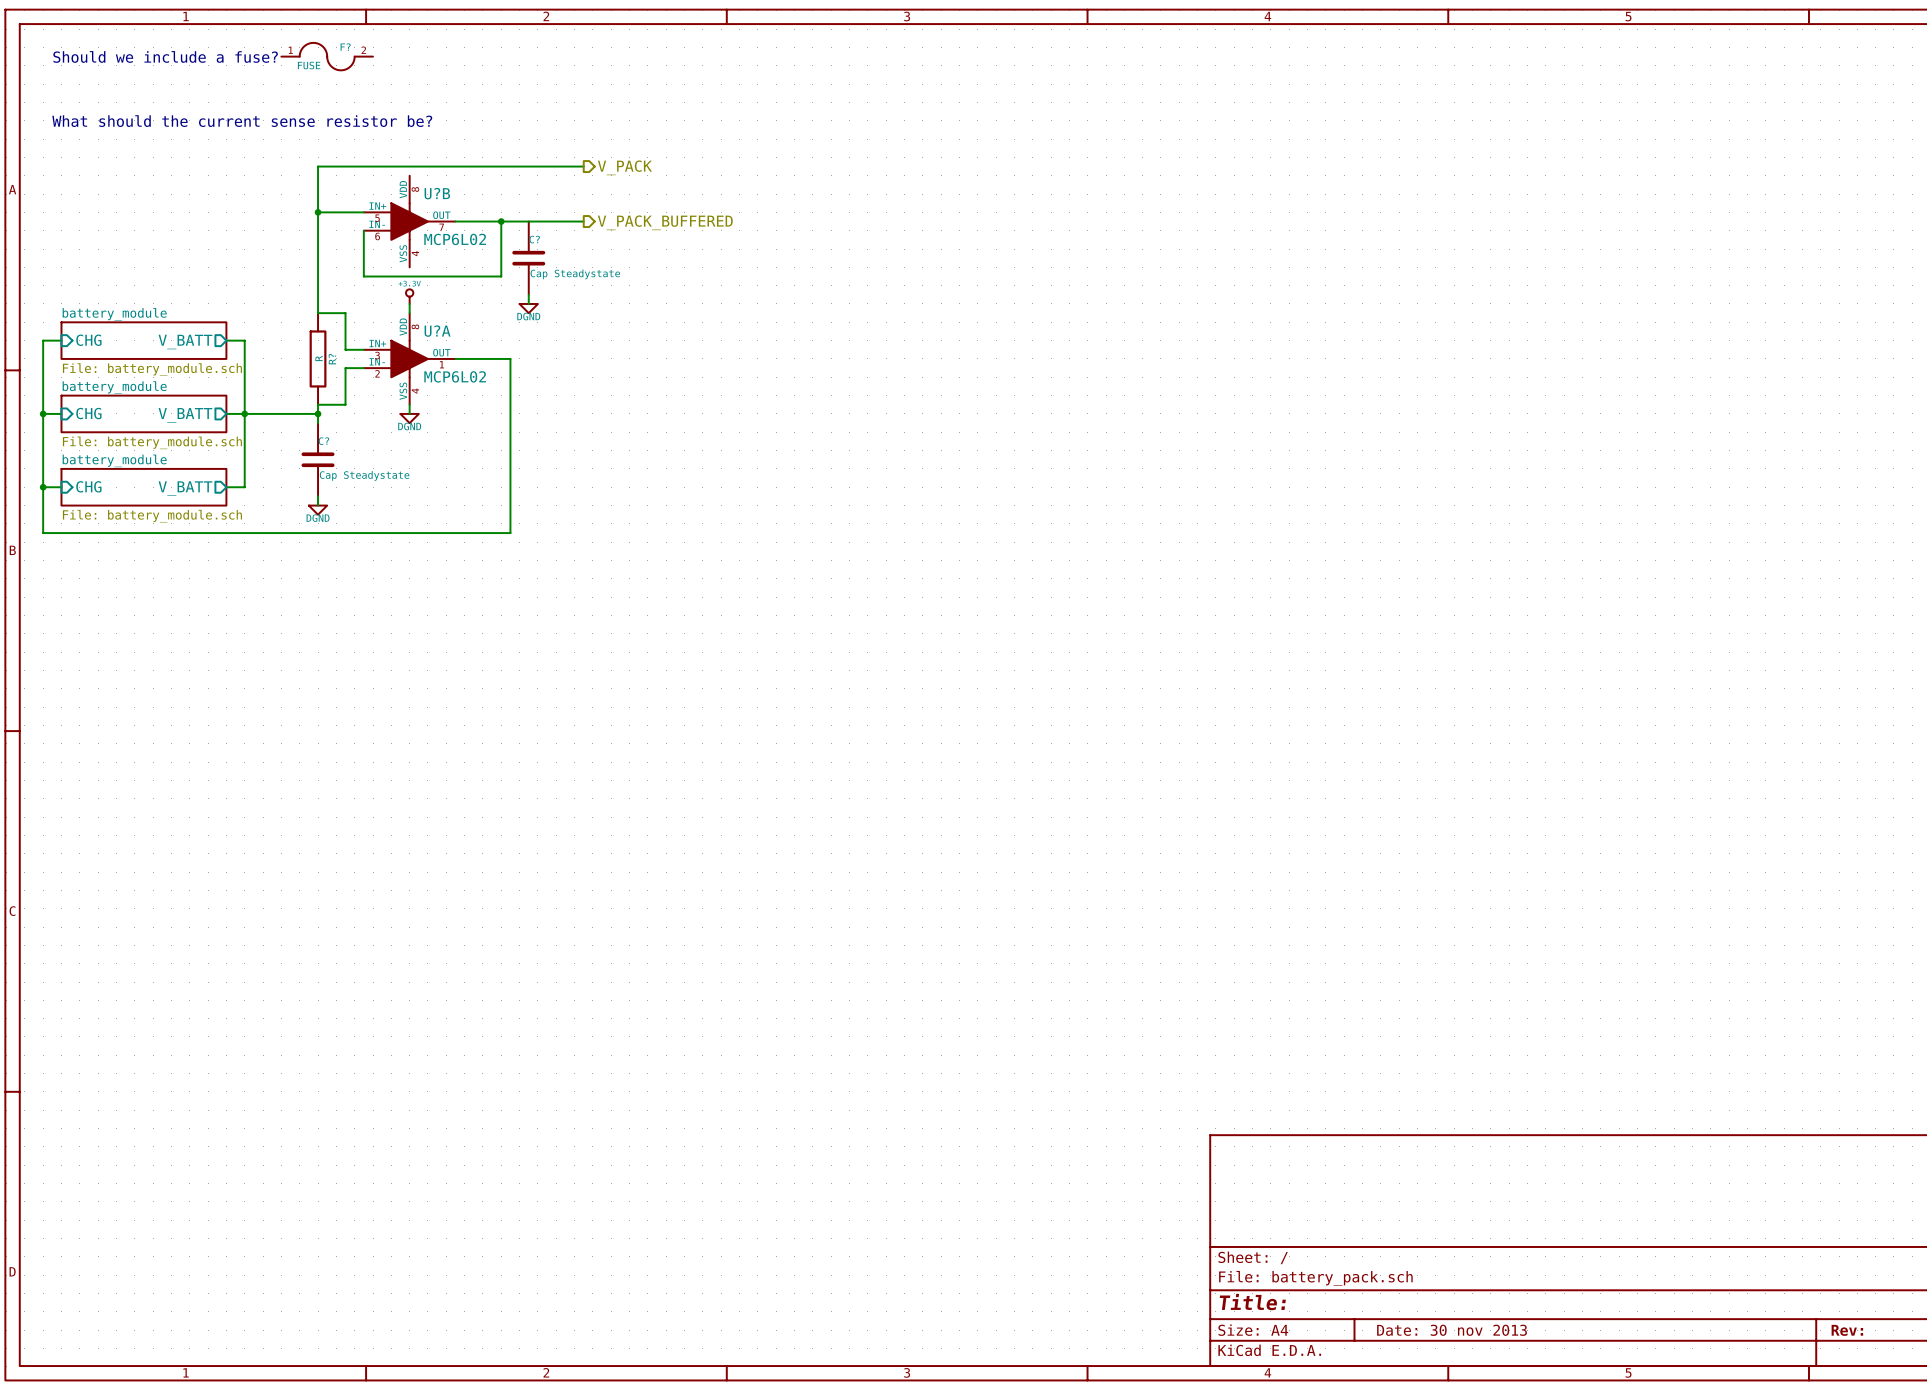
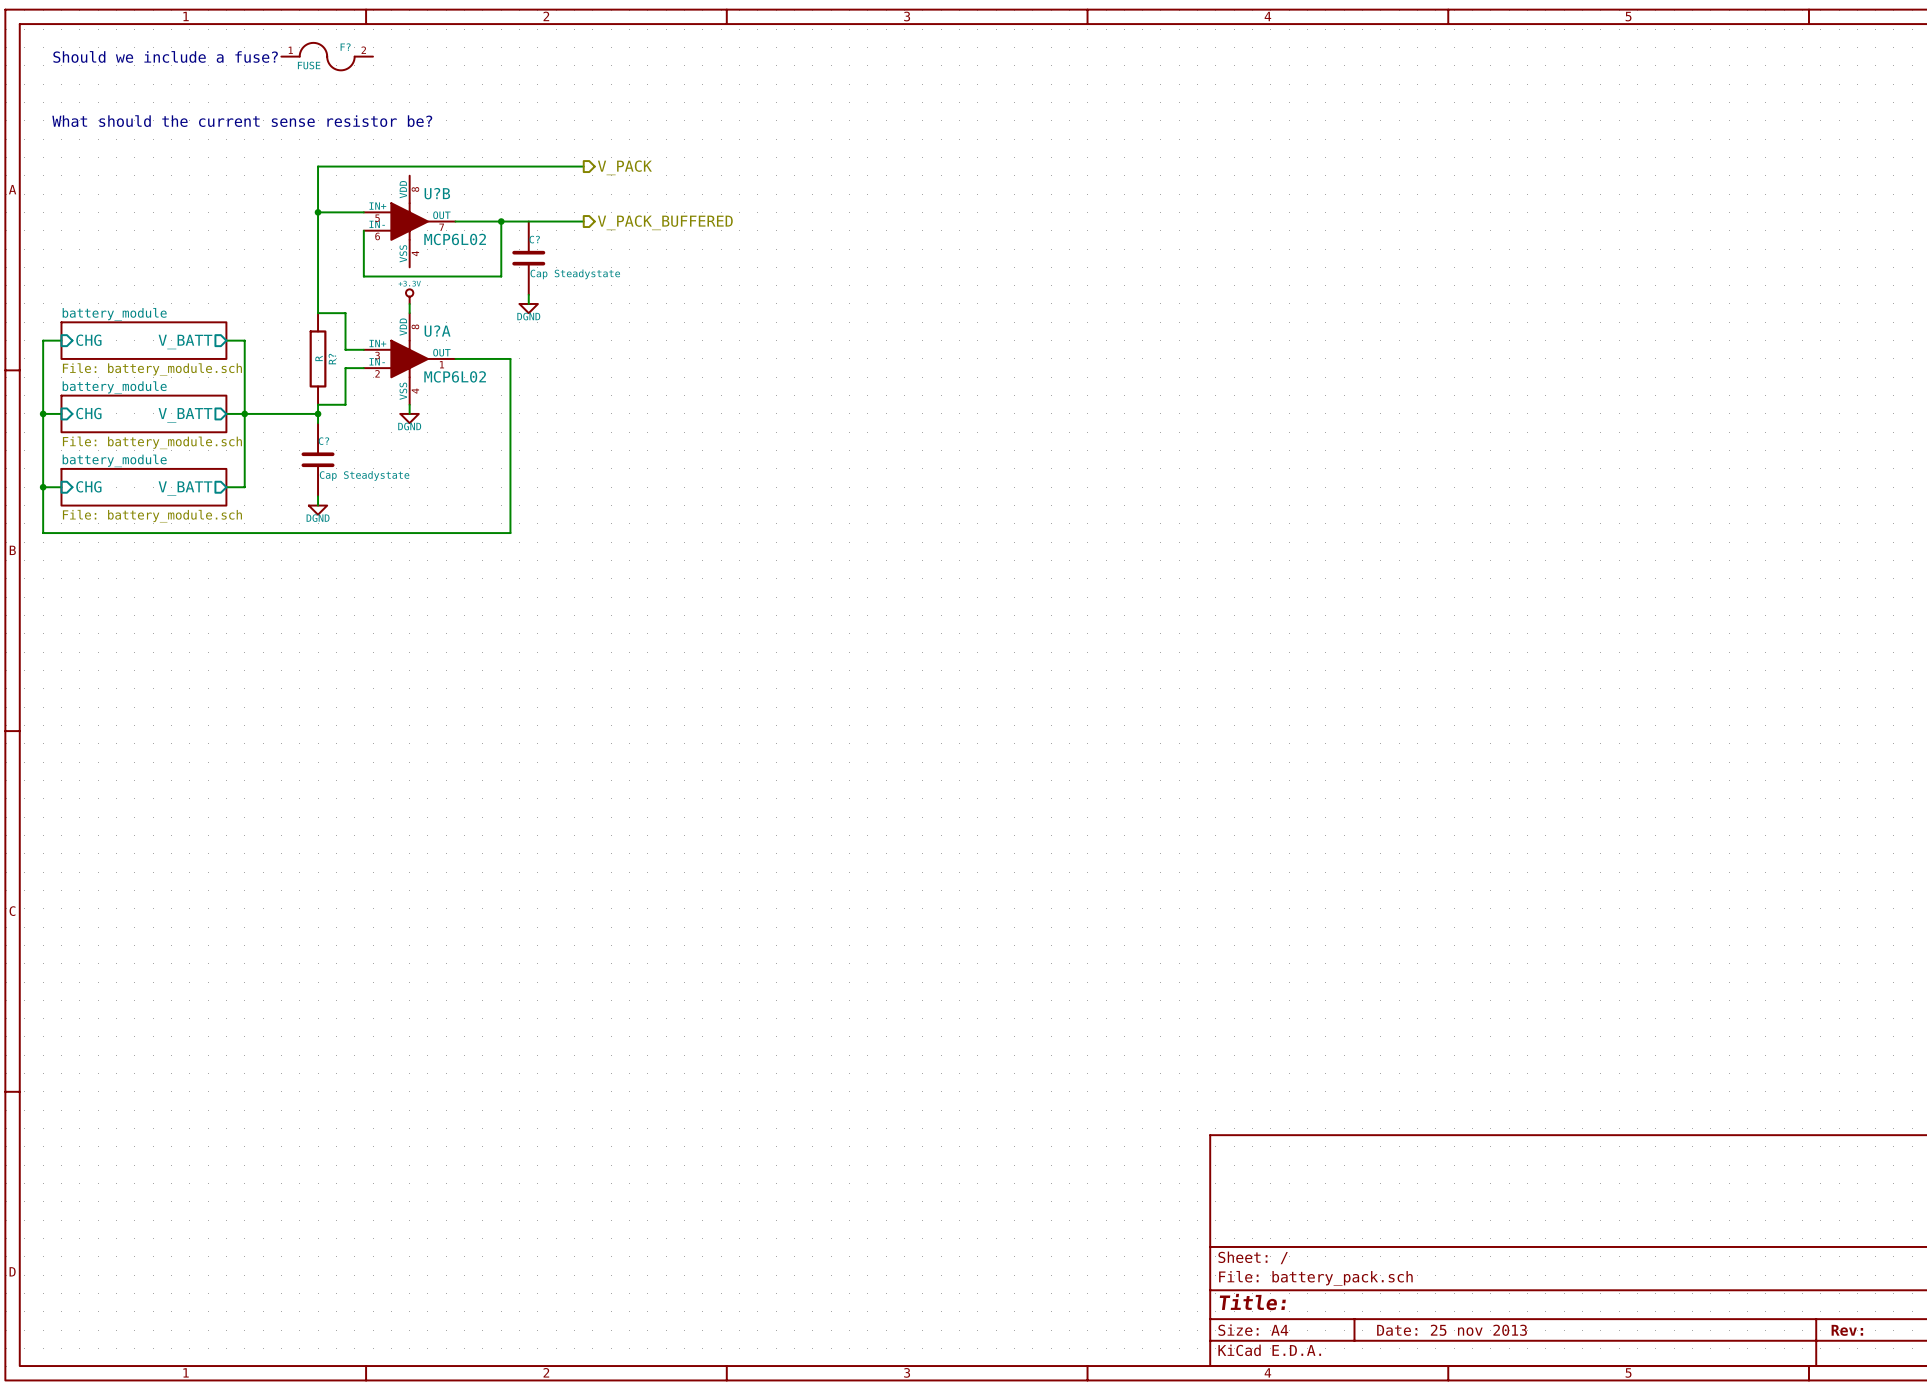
title block: Date: 30 nov 2013 (1452, 1330) -> Date: 25 nov 2013 (1452, 1330)

